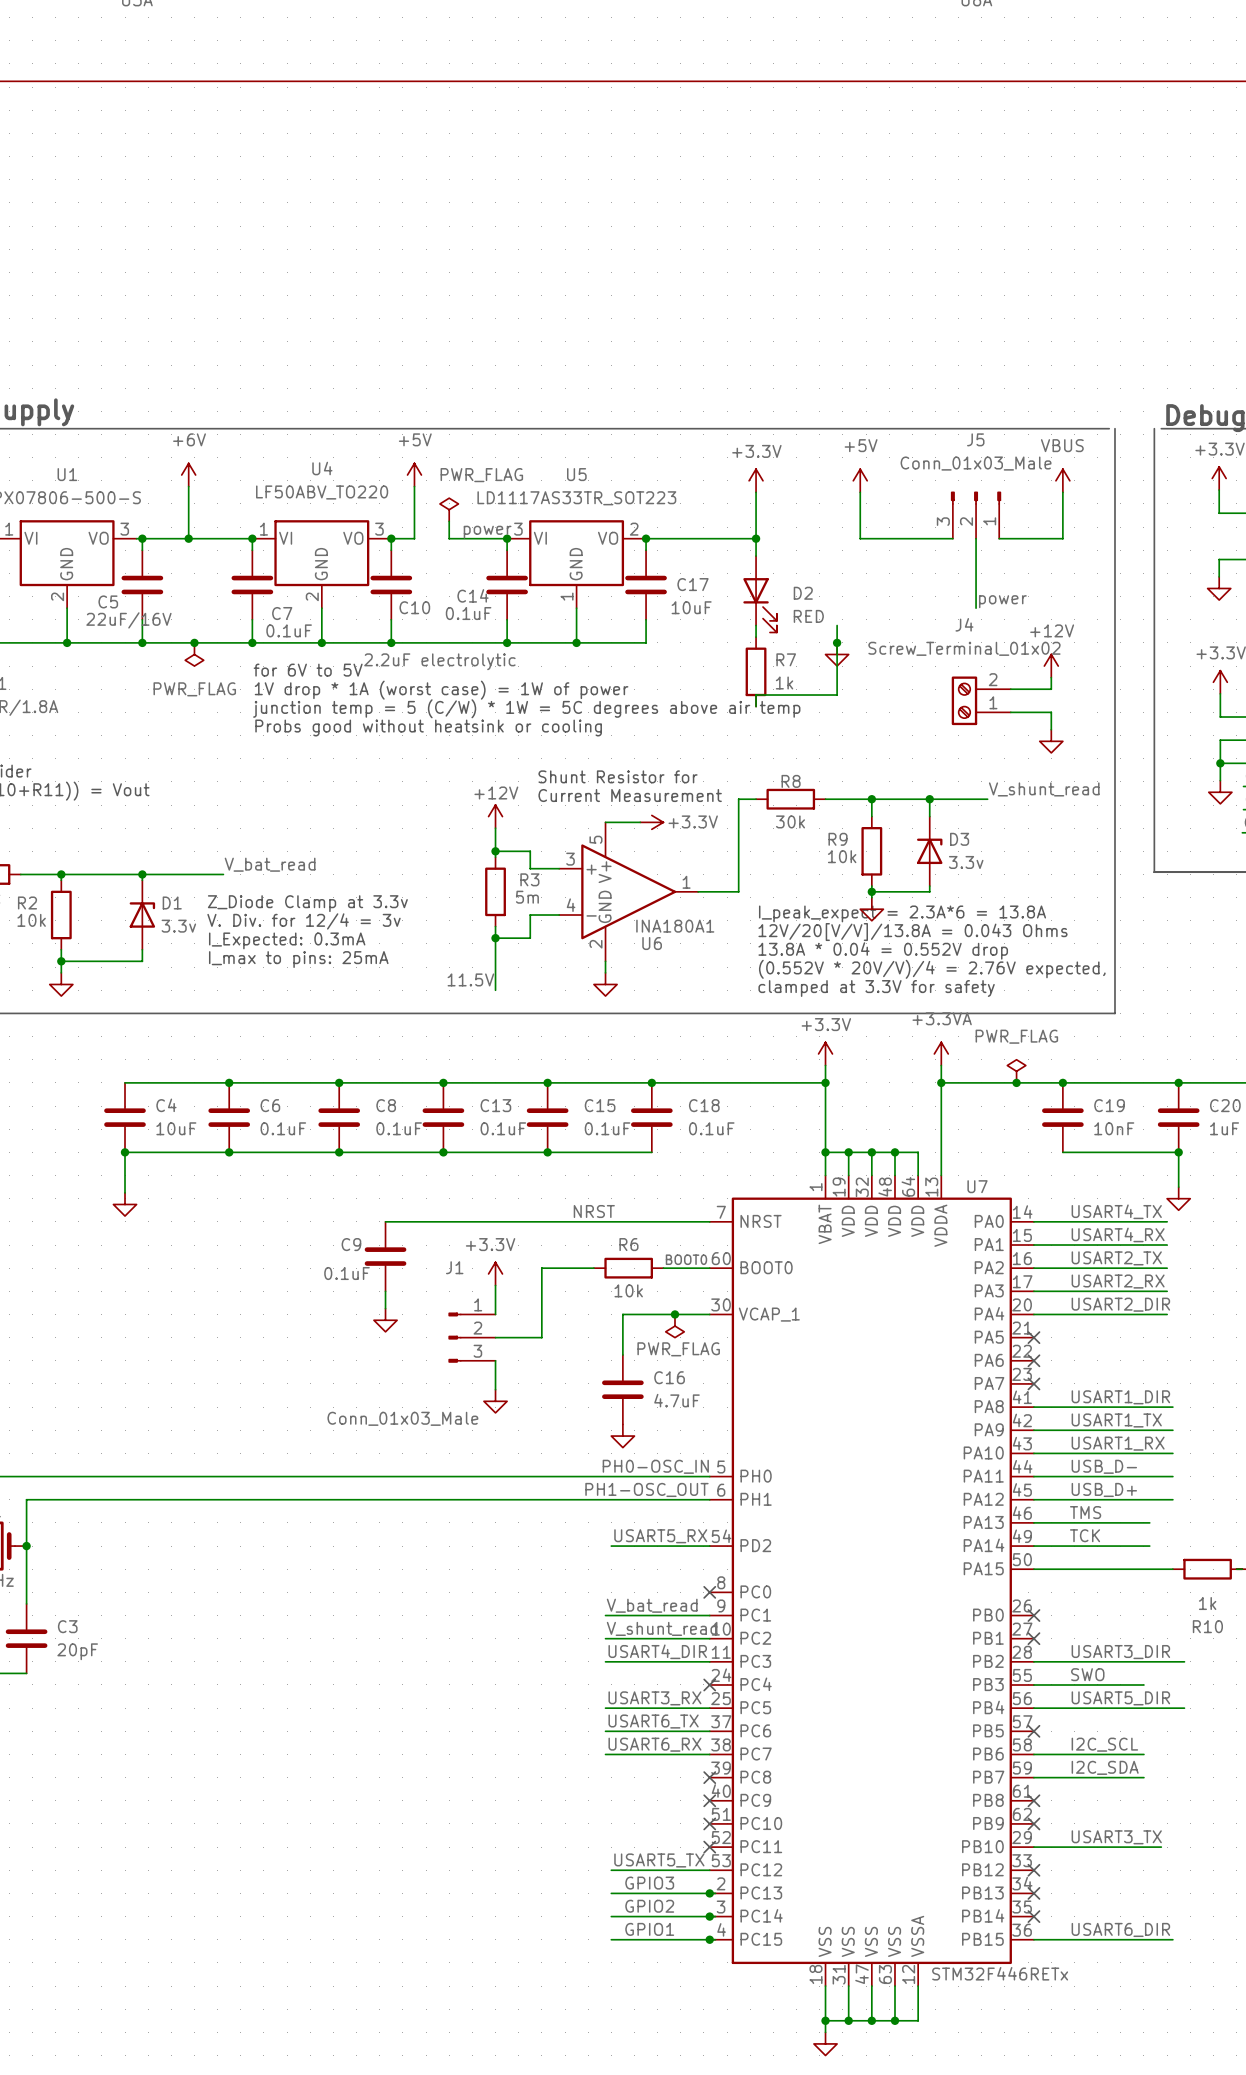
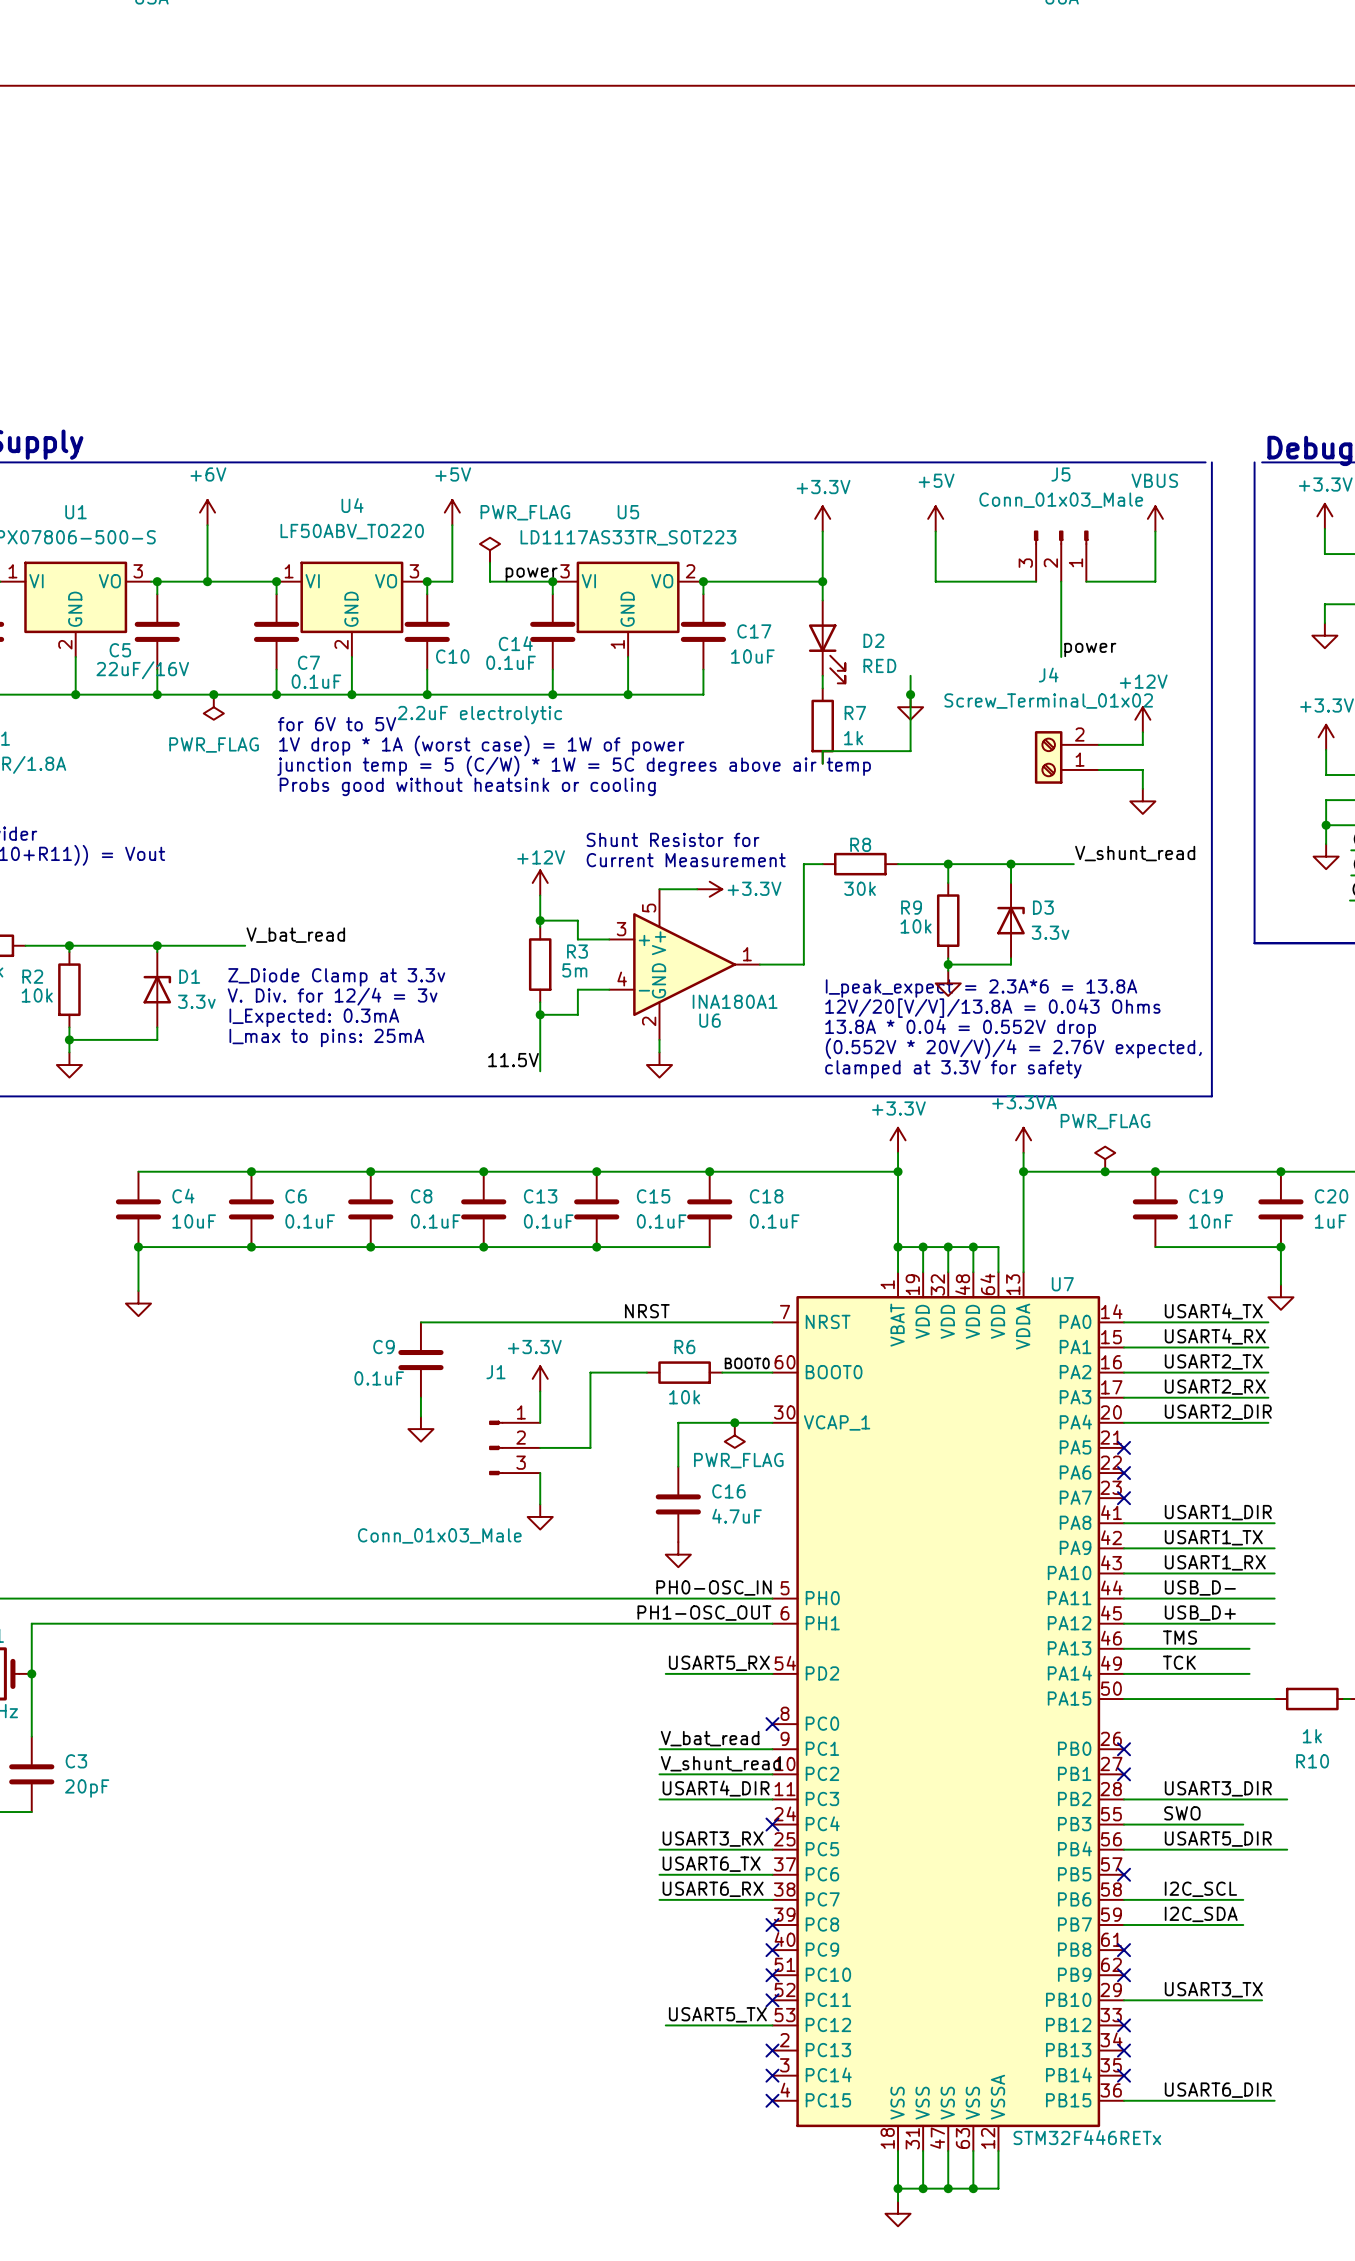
label: GPIO3 (649, 1883) -> none
wire: (611, 1893) (715, 1893) -> none
junction: (709, 1893) -> none
no-connect mark: none -> (772, 2050)
label: GPIO2 (649, 1906) -> none
wire: (611, 1916) (715, 1916) -> none
junction: (709, 1916) -> none
no-connect mark: none -> (772, 2075)
label: GPIO1 (649, 1929) -> none
wire: (611, 1939) (715, 1939) -> none
junction: (709, 1939) -> none
no-connect mark: none -> (772, 2100)

